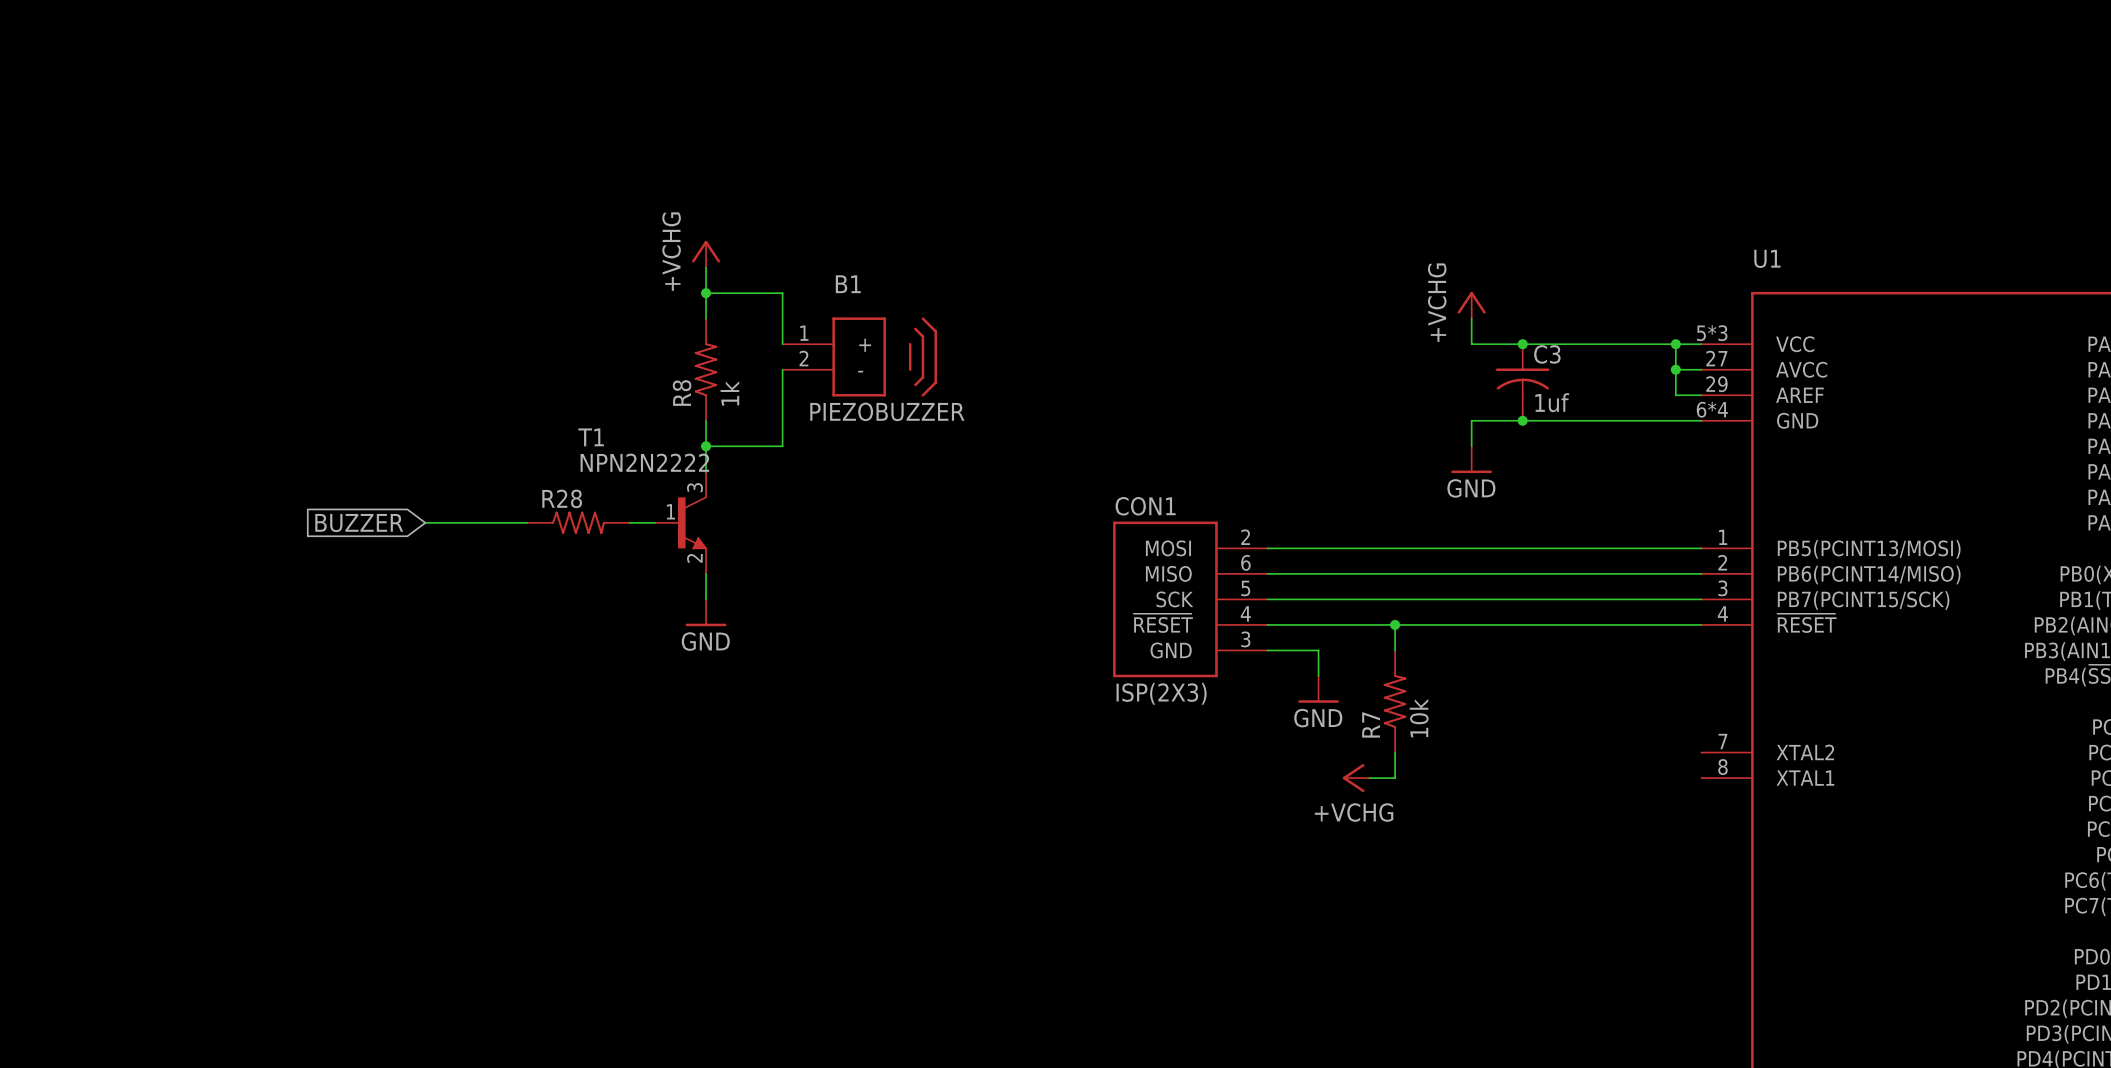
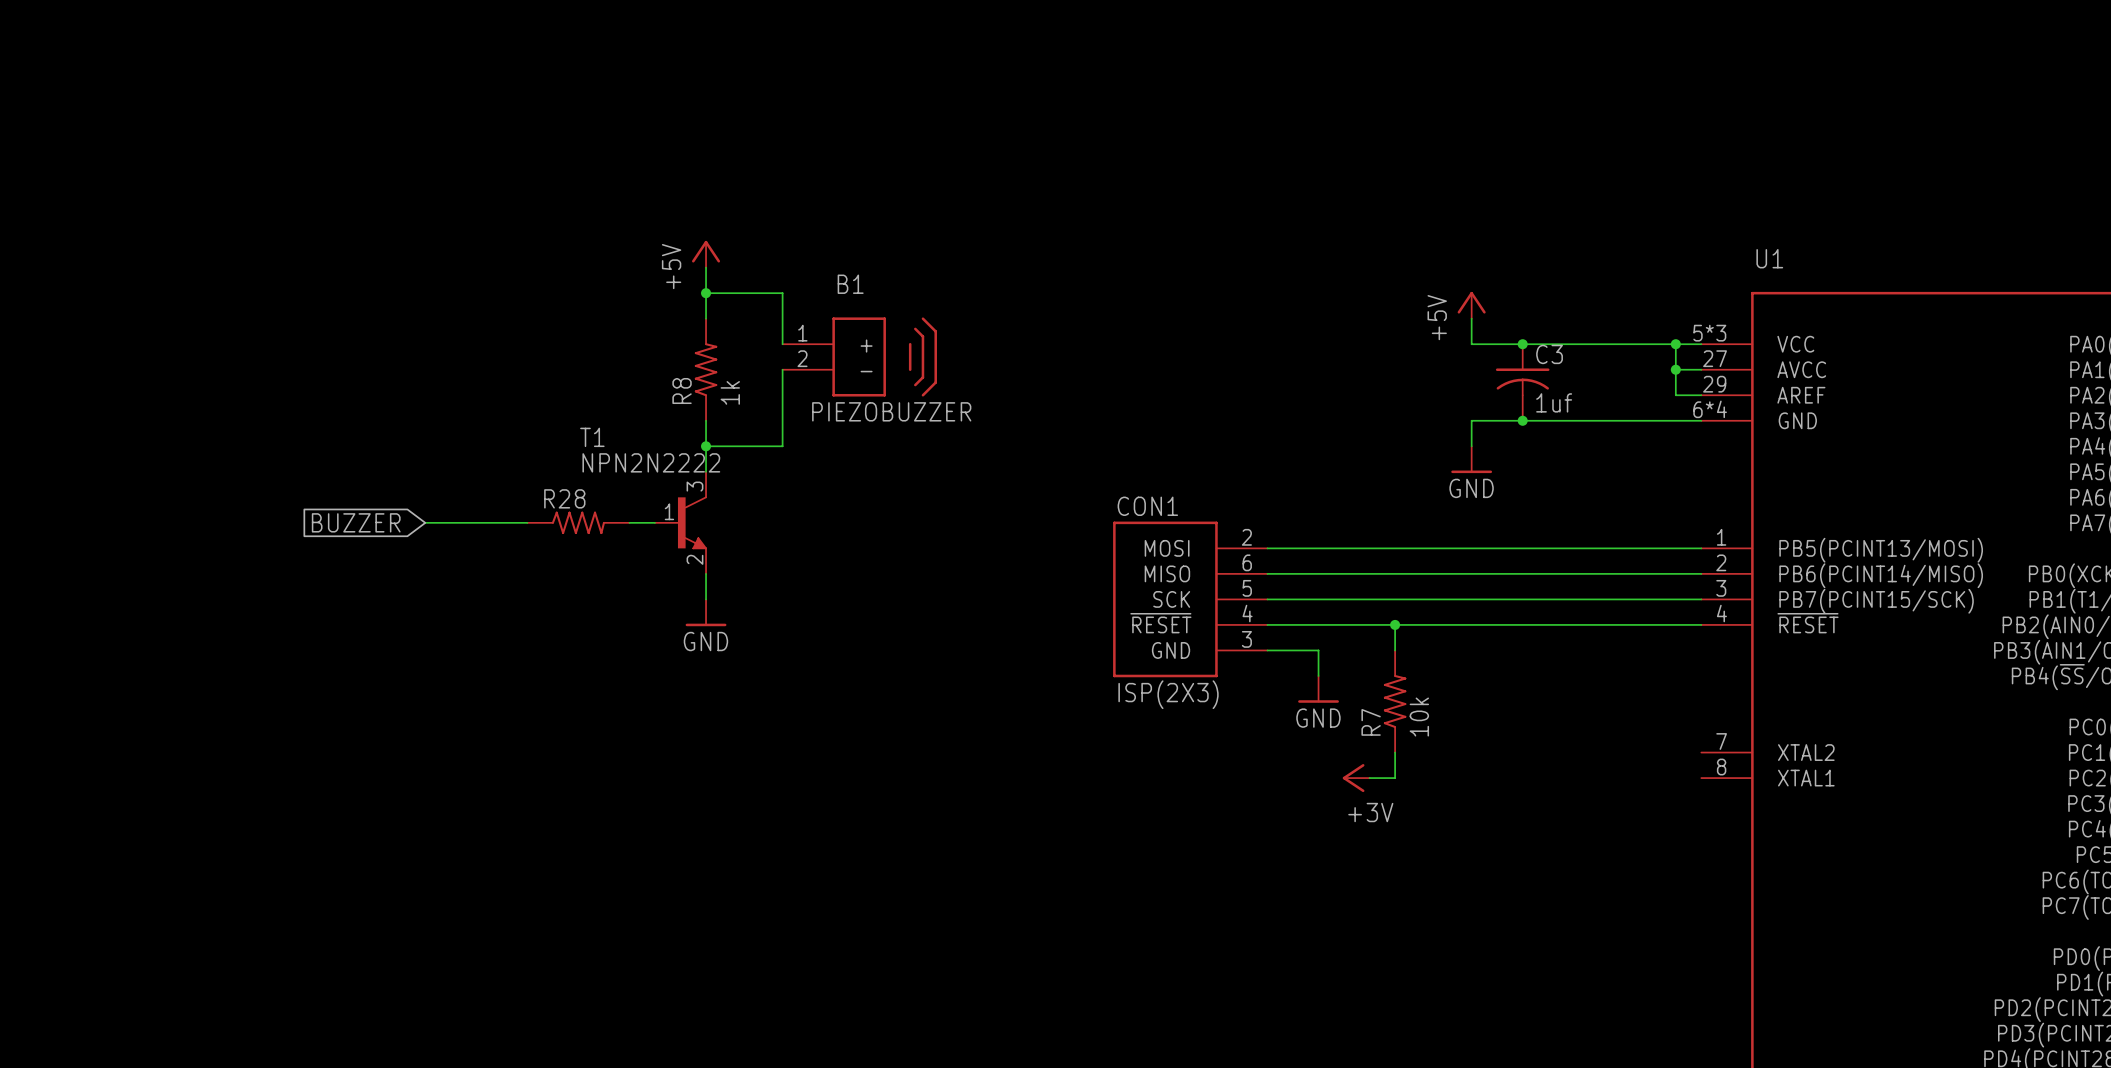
power symbol: +VCHG (706, 254) -> +5V (706, 254)
power symbol: +VCHG (1471, 305) -> +5V (1471, 305)
power symbol: +VCHG (1356, 778) -> +3V (1356, 778)

